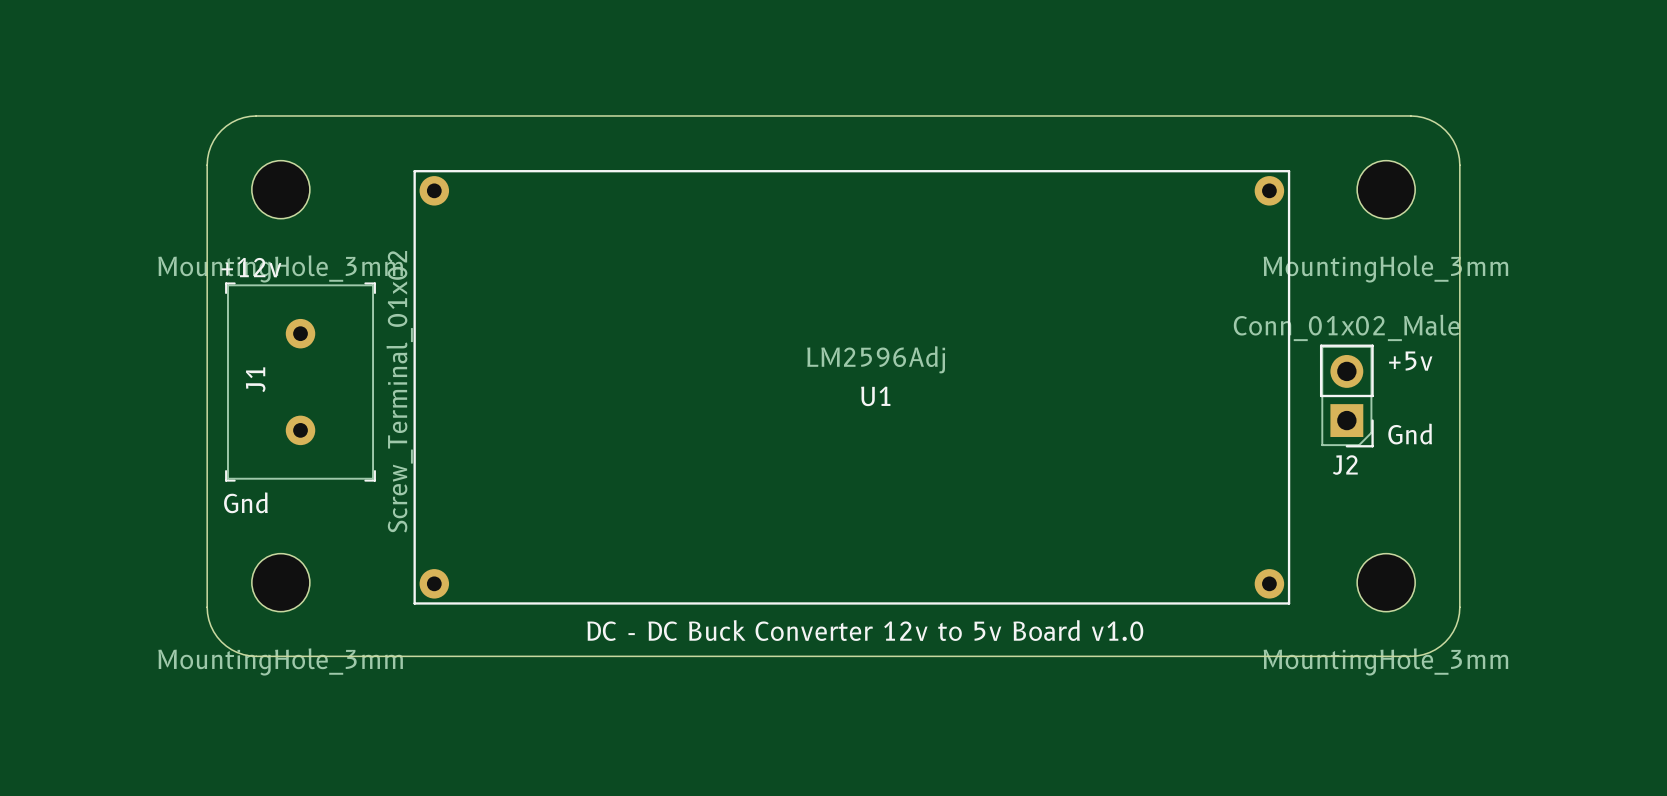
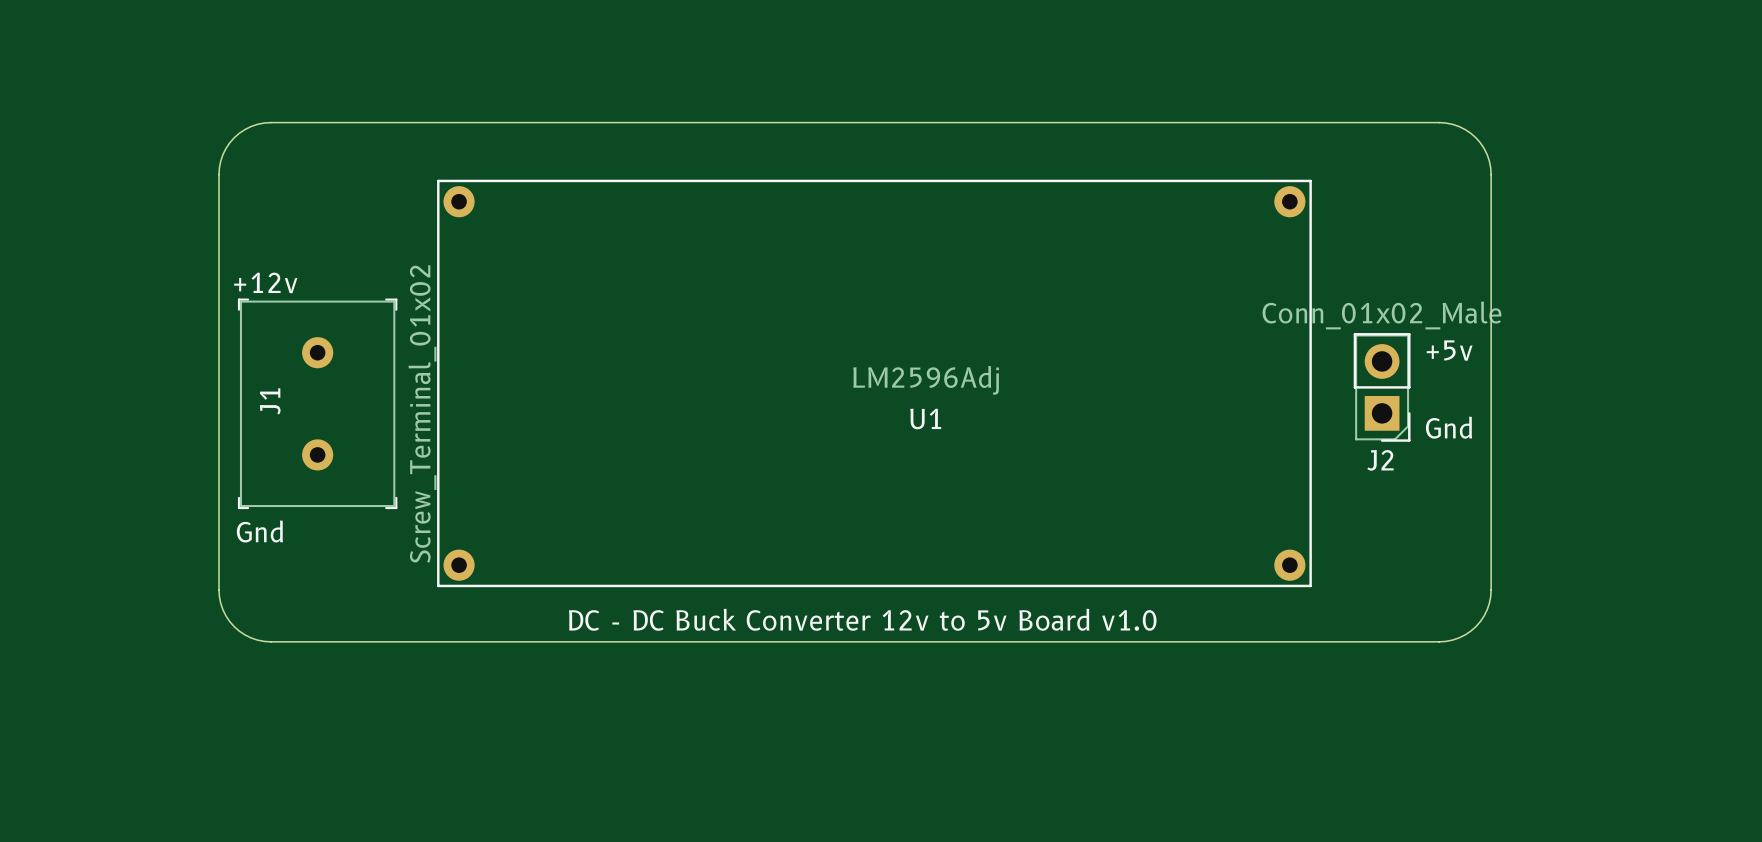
board edge: (1361, 115) (1410, 115) (1429, 119) (1440, 126) (1449, 135) (1456, 146) (1459, 158) (1459, 607) (1458, 619) (1449, 637) (1440, 646) (1429, 652) (1410, 656) (249, 655) (237, 652) (226, 646) (217, 637) (210, 626) (207, 607) (207, 558) -> (1439, 122) (1459, 126) (1475, 137) (1487, 154) (1491, 174) (1490, 596) (1487, 609) (1480, 621) (1470, 631) (1459, 637) (1439, 641) (270, 641) (251, 637) (234, 626) (222, 609) (218, 589)
U1 footprint: [413, 170, 1291, 605] -> [437, 179, 1312, 588]
part: MountingHole_3mm (280, 189) -> none
part: MountingHole_3mm (1386, 189) -> none
text position: +5v (1410, 361) -> +5v (1449, 350)
J2 position: (1346, 395) -> (1382, 387)
text position: Gnd (1410, 434) -> Gnd (1448, 427)
part: MountingHole_3mm (280, 582) -> none
part: MountingHole_3mm (1386, 582) -> none
text position: DC - DC Buck Converter 12v to 5v Board v1.0 (865, 630) -> DC - DC Buck Converter 12v to 5v Board v1.0 (862, 619)

